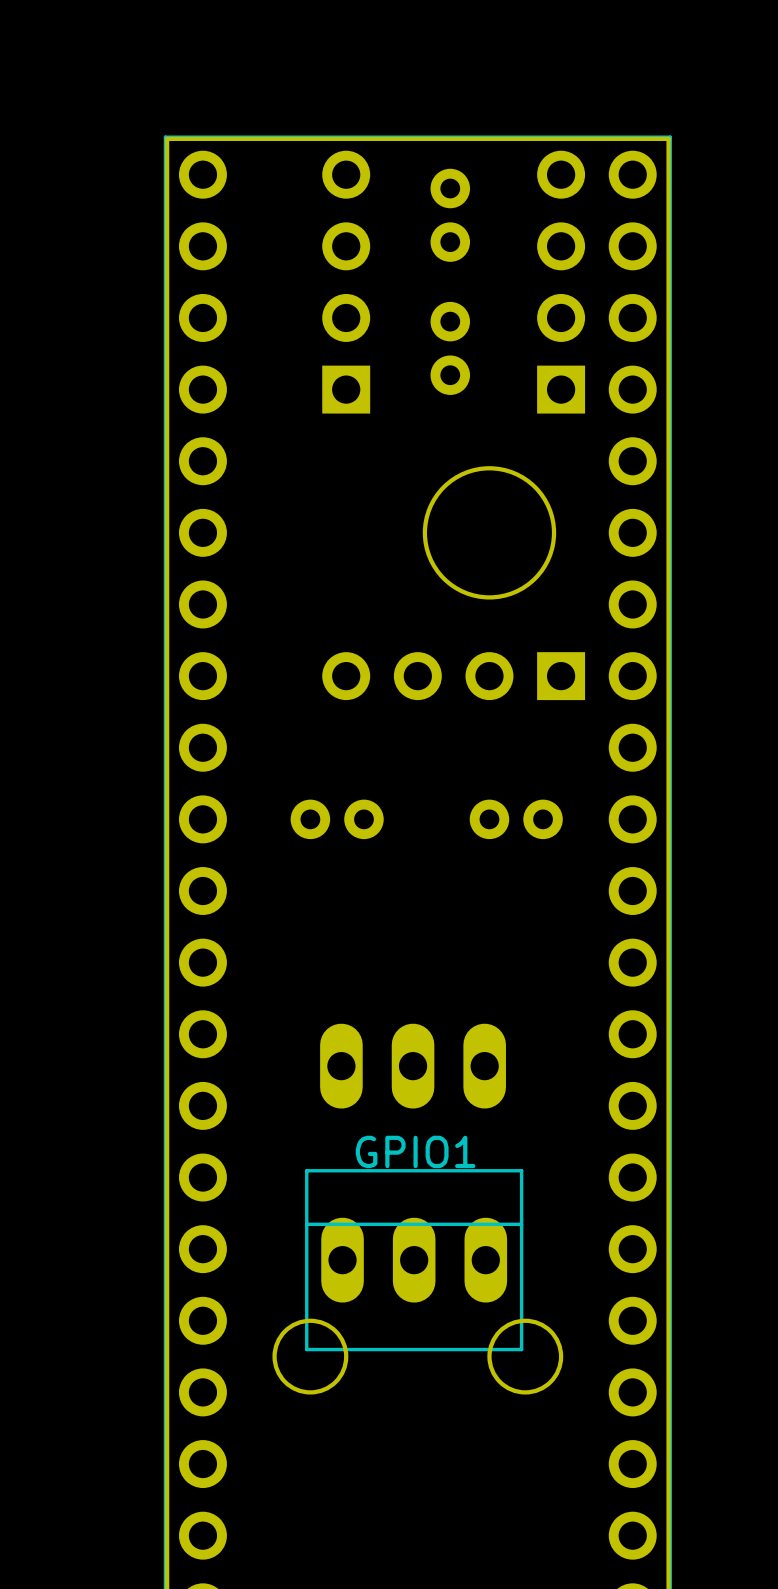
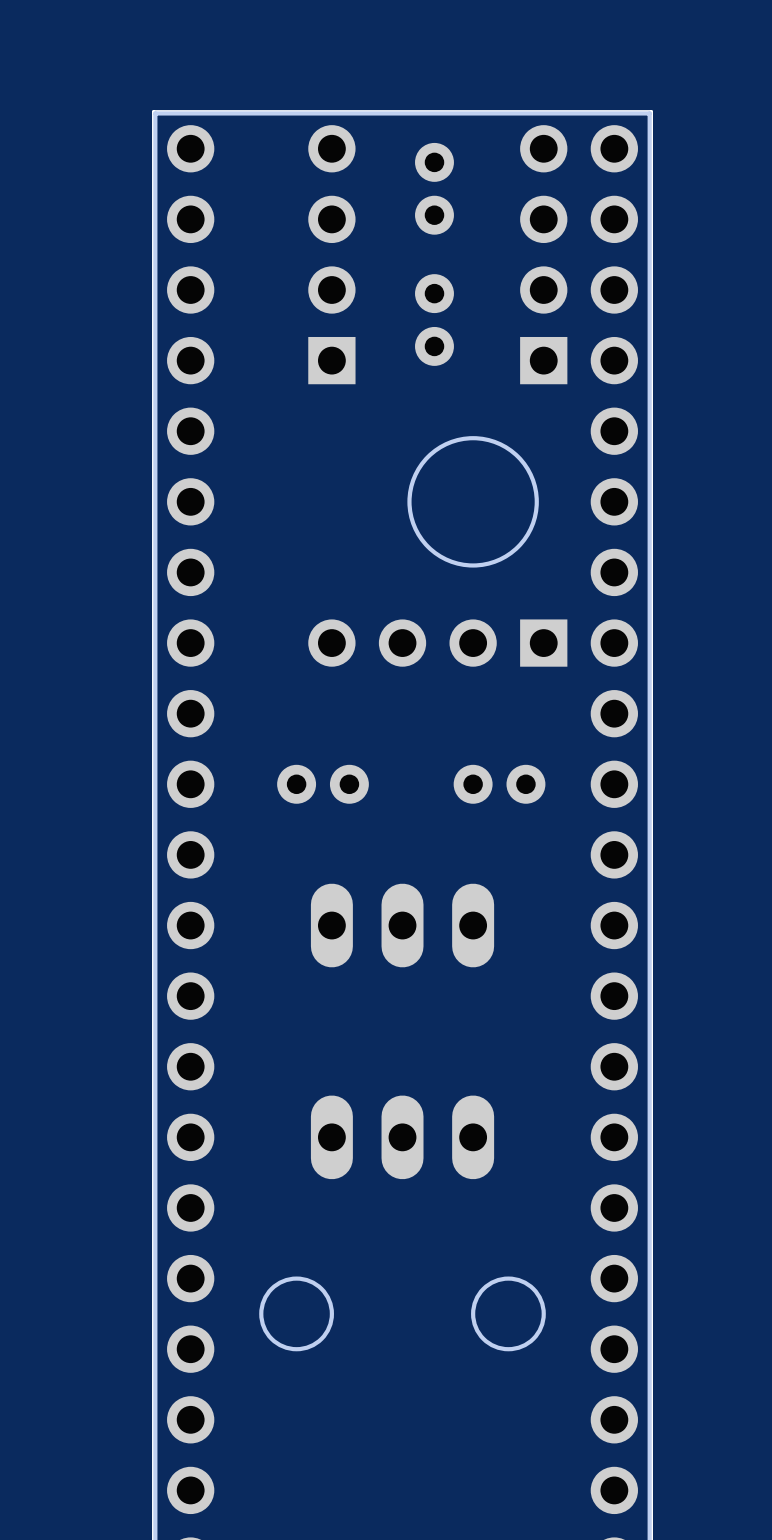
part position: (413, 1066) -> (402, 925)
GPIO1 side: top (414, 1260) -> bottom (402, 1137)

